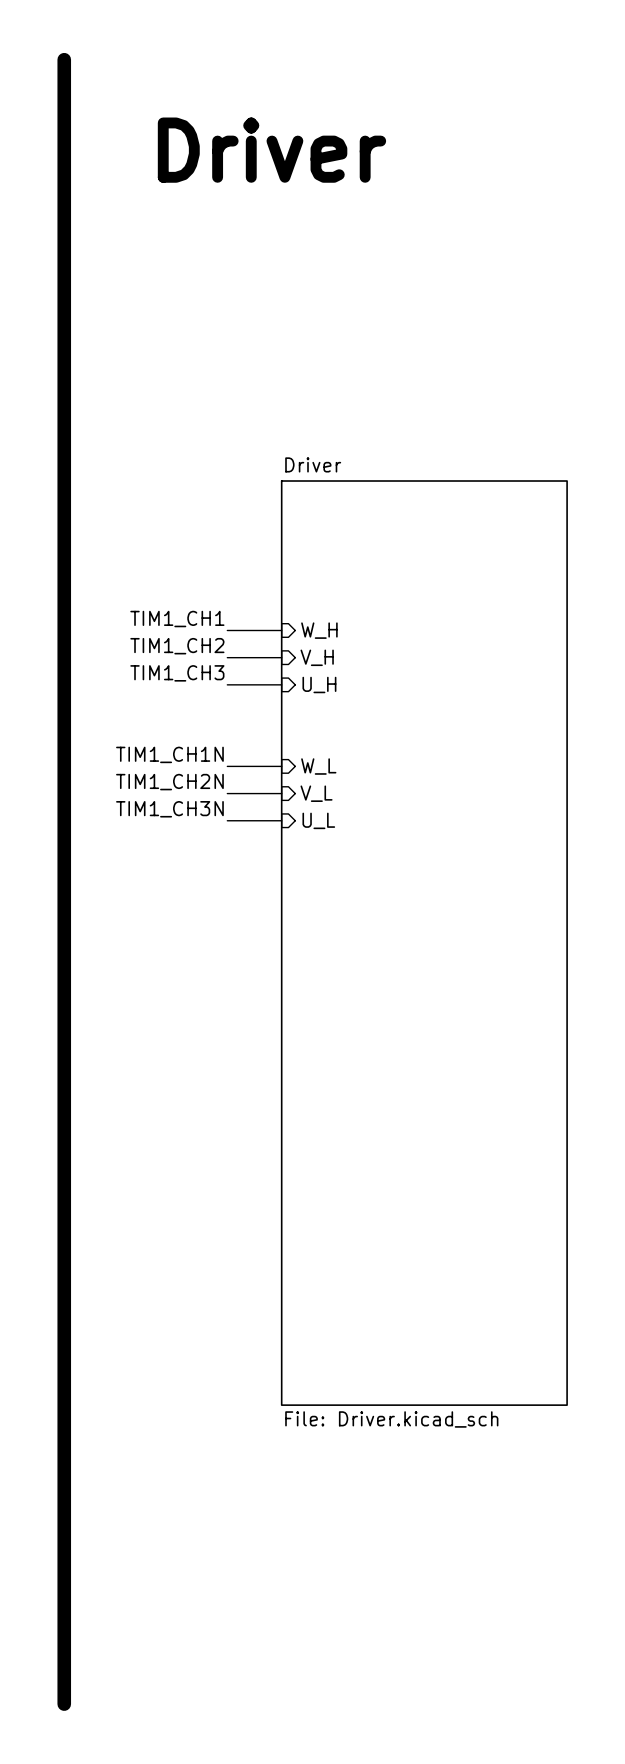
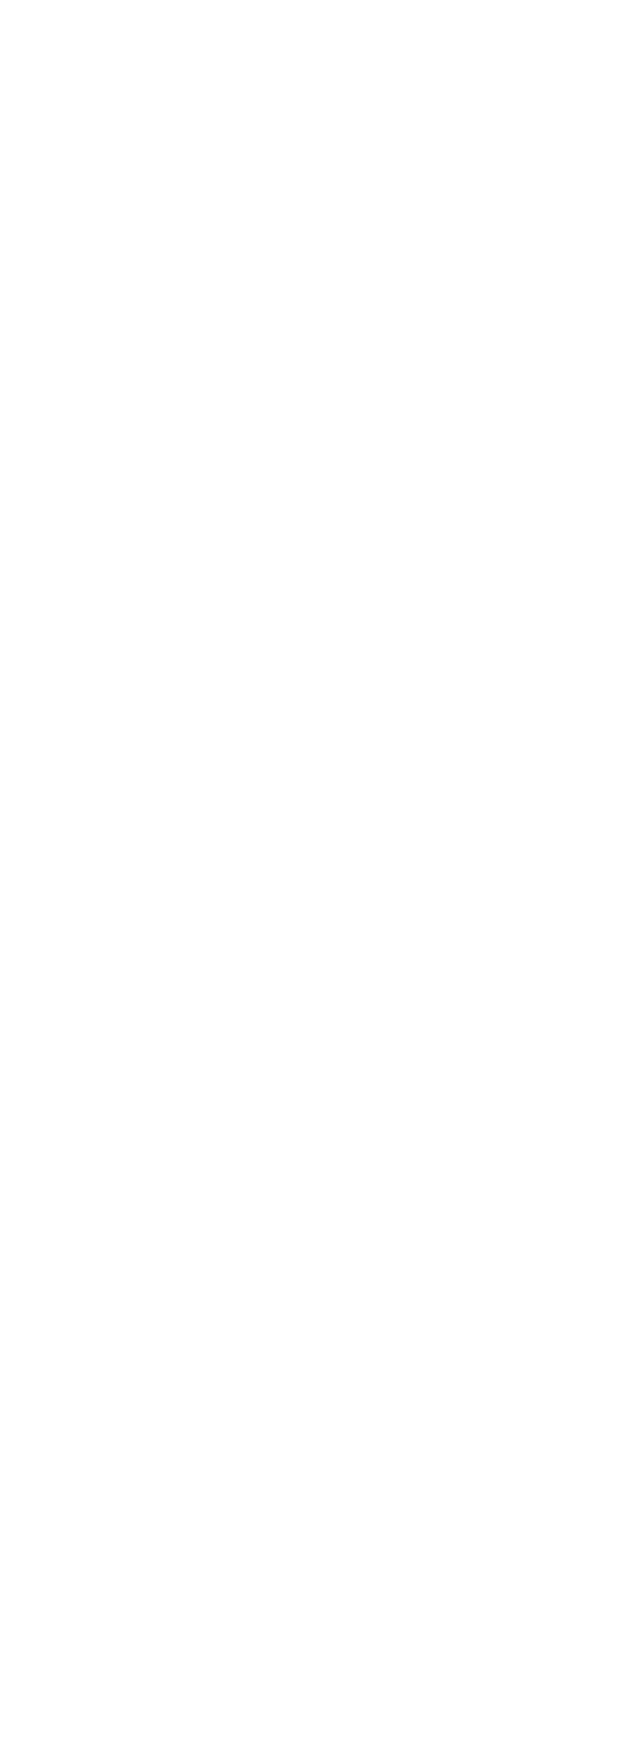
line: (64, 59) (64, 1704) -> none
text: Driver (271, 150) -> none
label: TIM1_CH1 (177, 619) -> none
wire: (227, 630) (281, 630) -> none
sheet pin: W_H (319, 630) -> none
label: TIM1_CH2 (177, 646) -> none
wire: (227, 657) (281, 657) -> none
sheet pin: V_H (317, 657) -> none
label: TIM1_CH3 (177, 673) -> none
wire: (227, 684) (281, 684) -> none
sheet pin: U_H (319, 684) -> none
label: TIM1_CH1N (169, 754) -> none
wire: (227, 766) (281, 766) -> none
sheet pin: W_L (318, 766) -> none
label: TIM1_CH2N (169, 782) -> none
wire: (227, 793) (281, 793) -> none
sheet pin: V_L (316, 793) -> none
label: TIM1_CH3N (169, 809) -> none
wire: (227, 820) (281, 820) -> none
sheet pin: U_L (318, 820) -> none
sheet Driver: File: Driver.kicad_sch (424, 943) -> none

